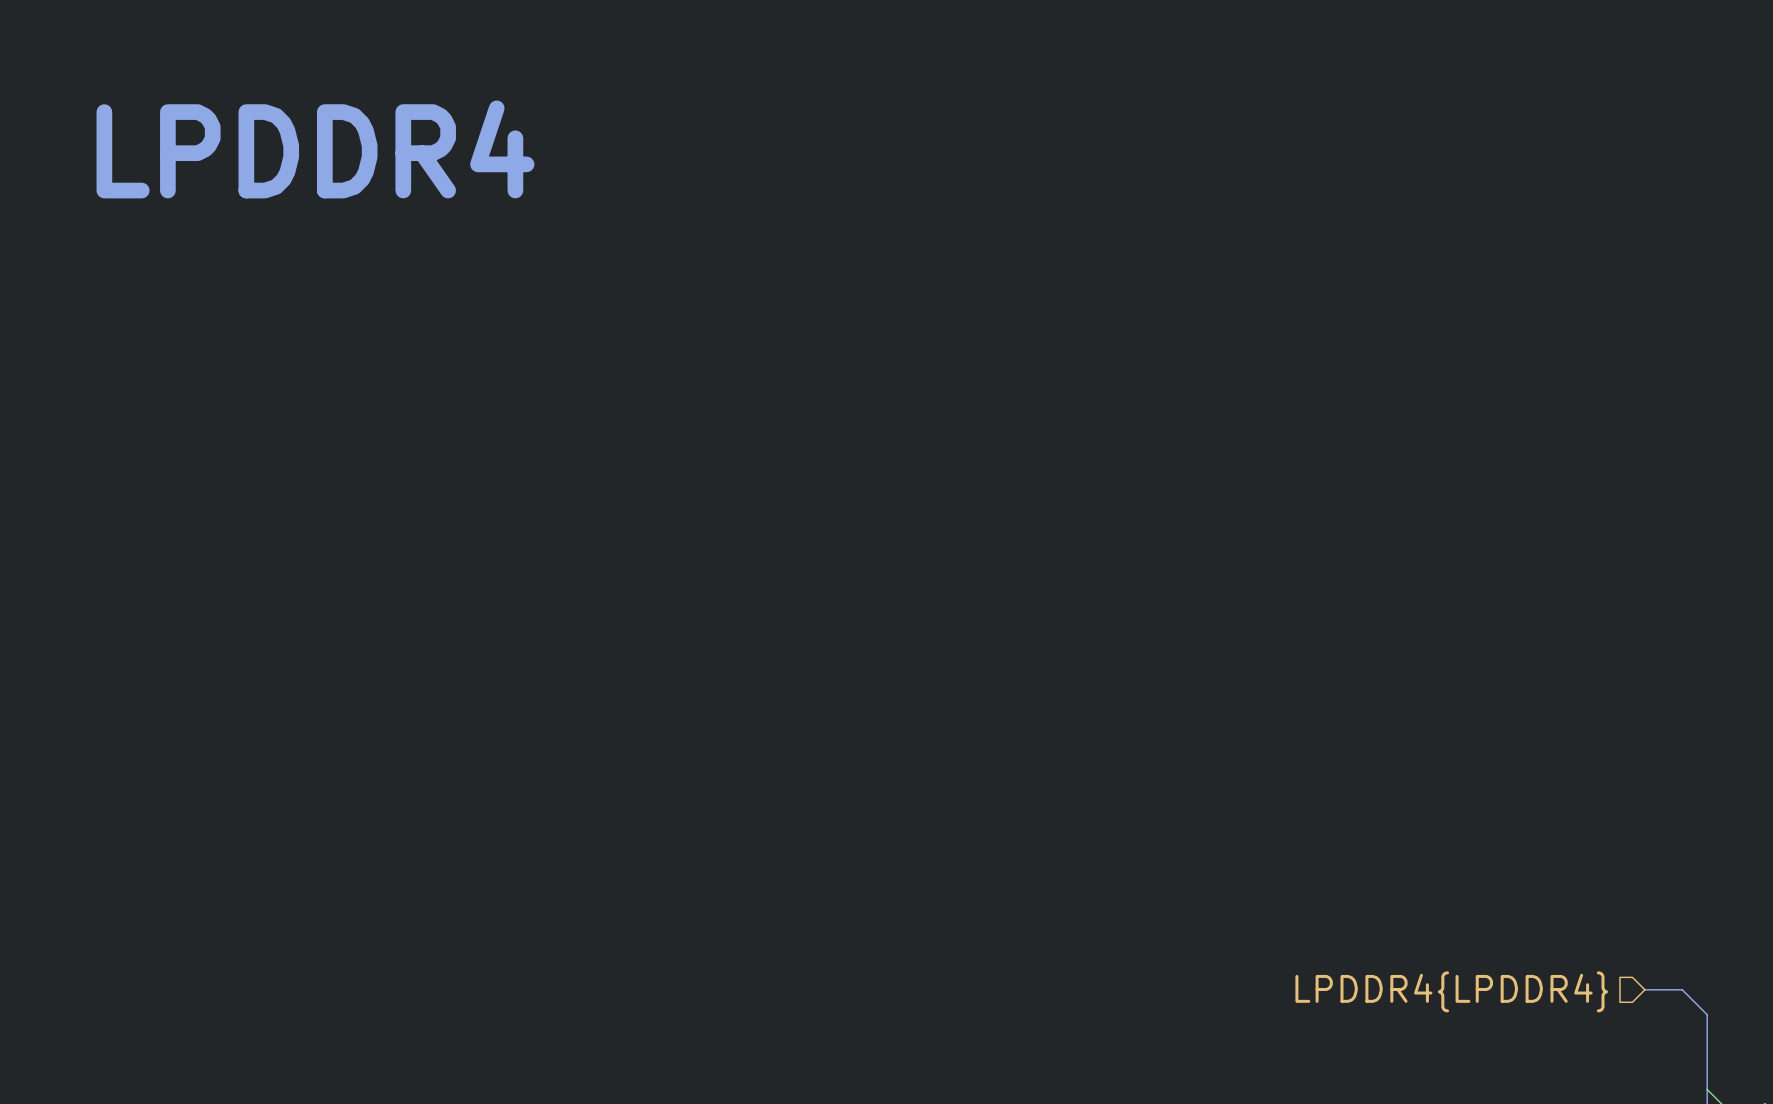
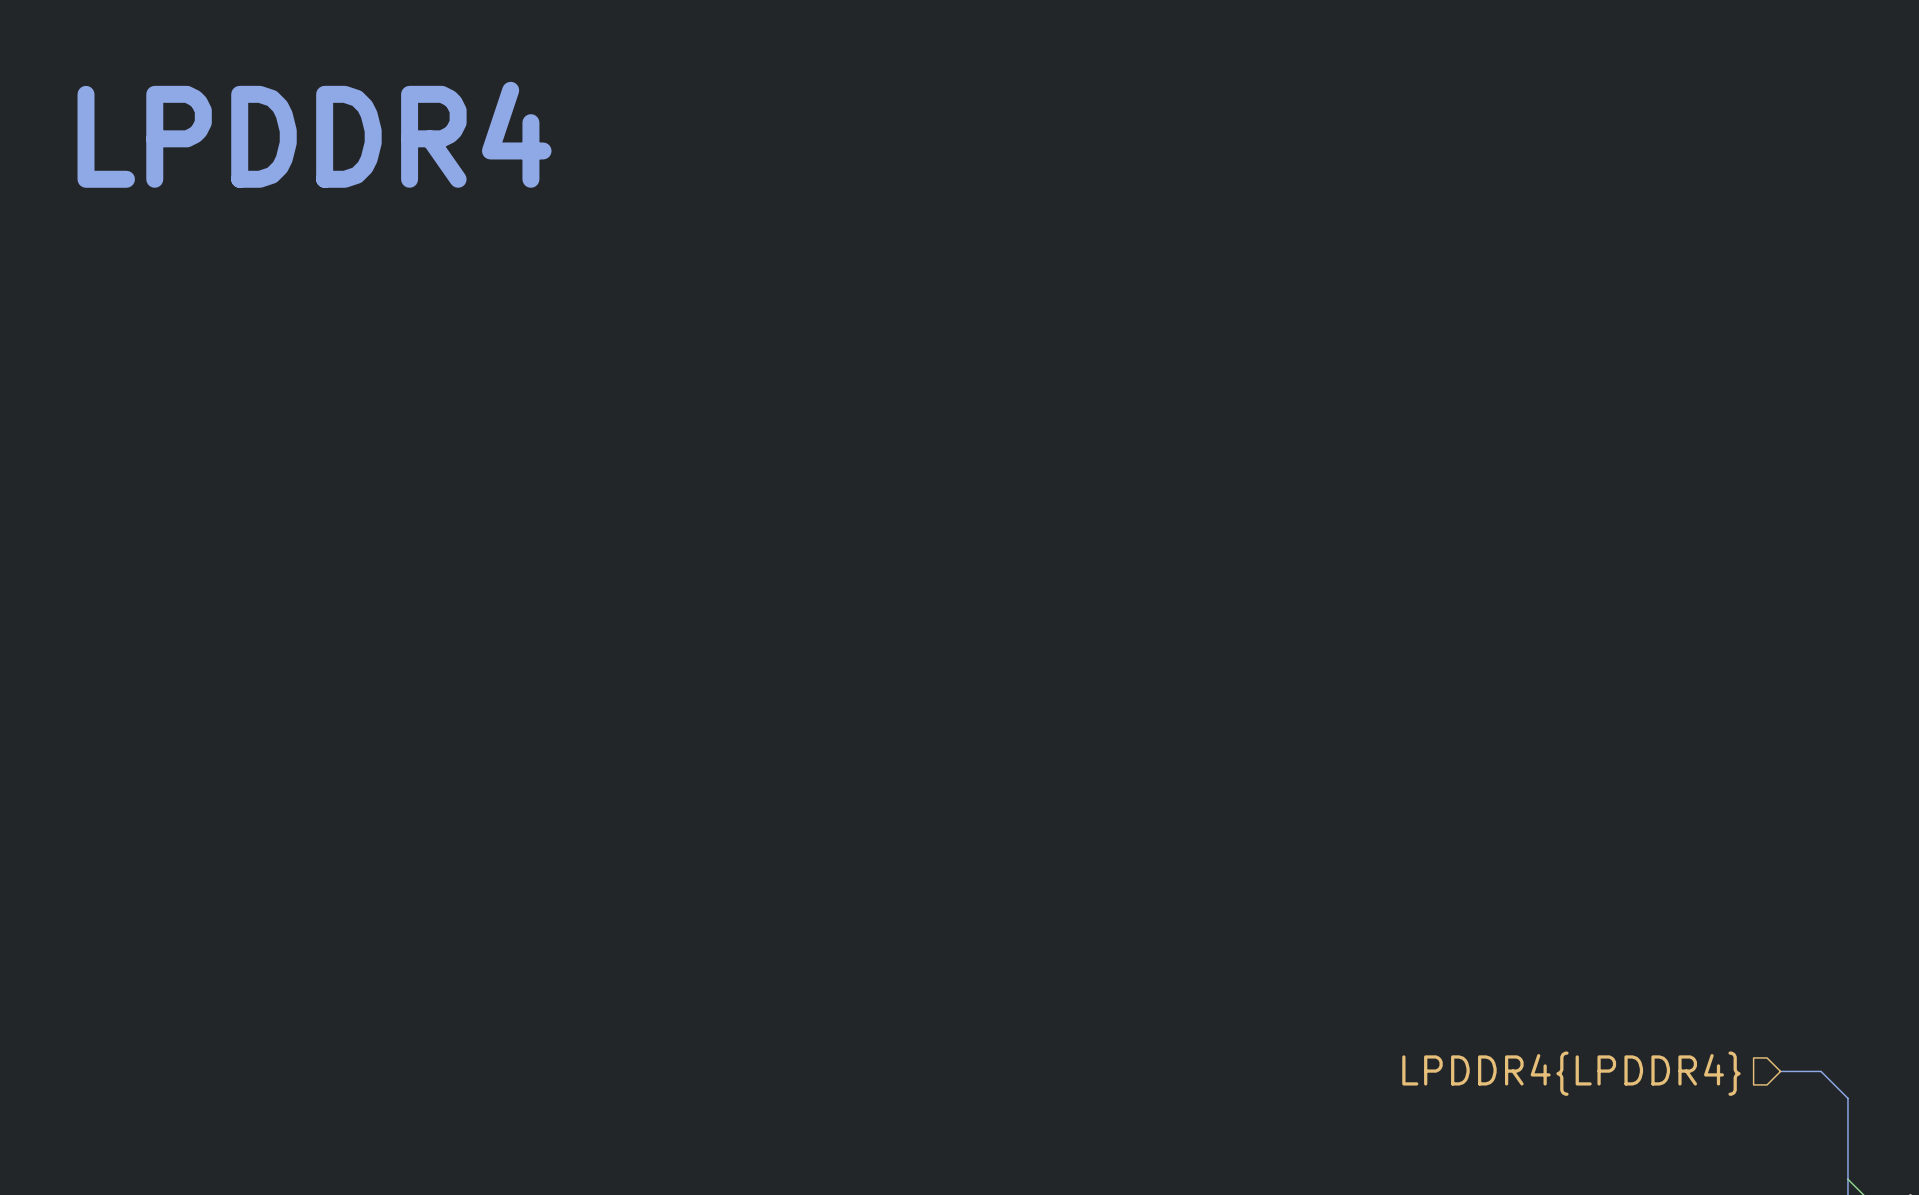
text position: LPDDR4 (315, 149) -> LPDDR4 (314, 134)

